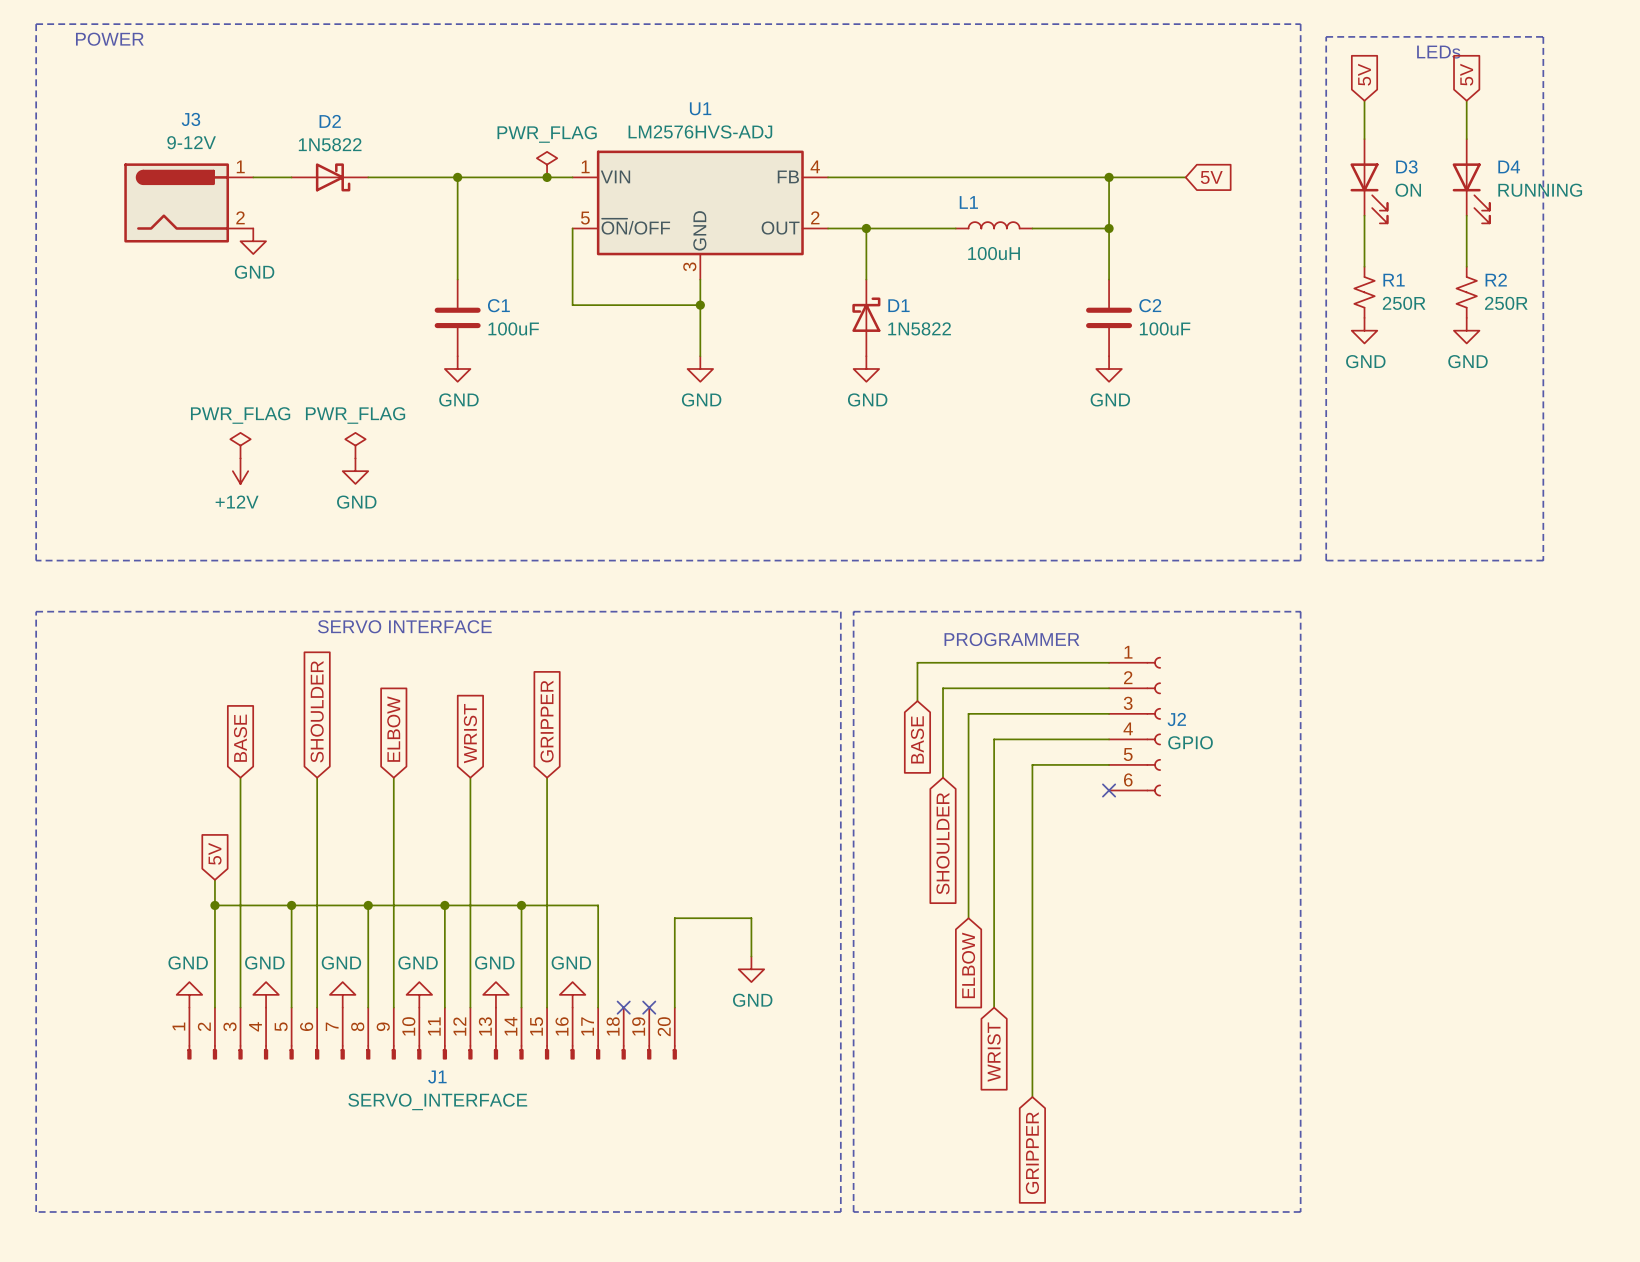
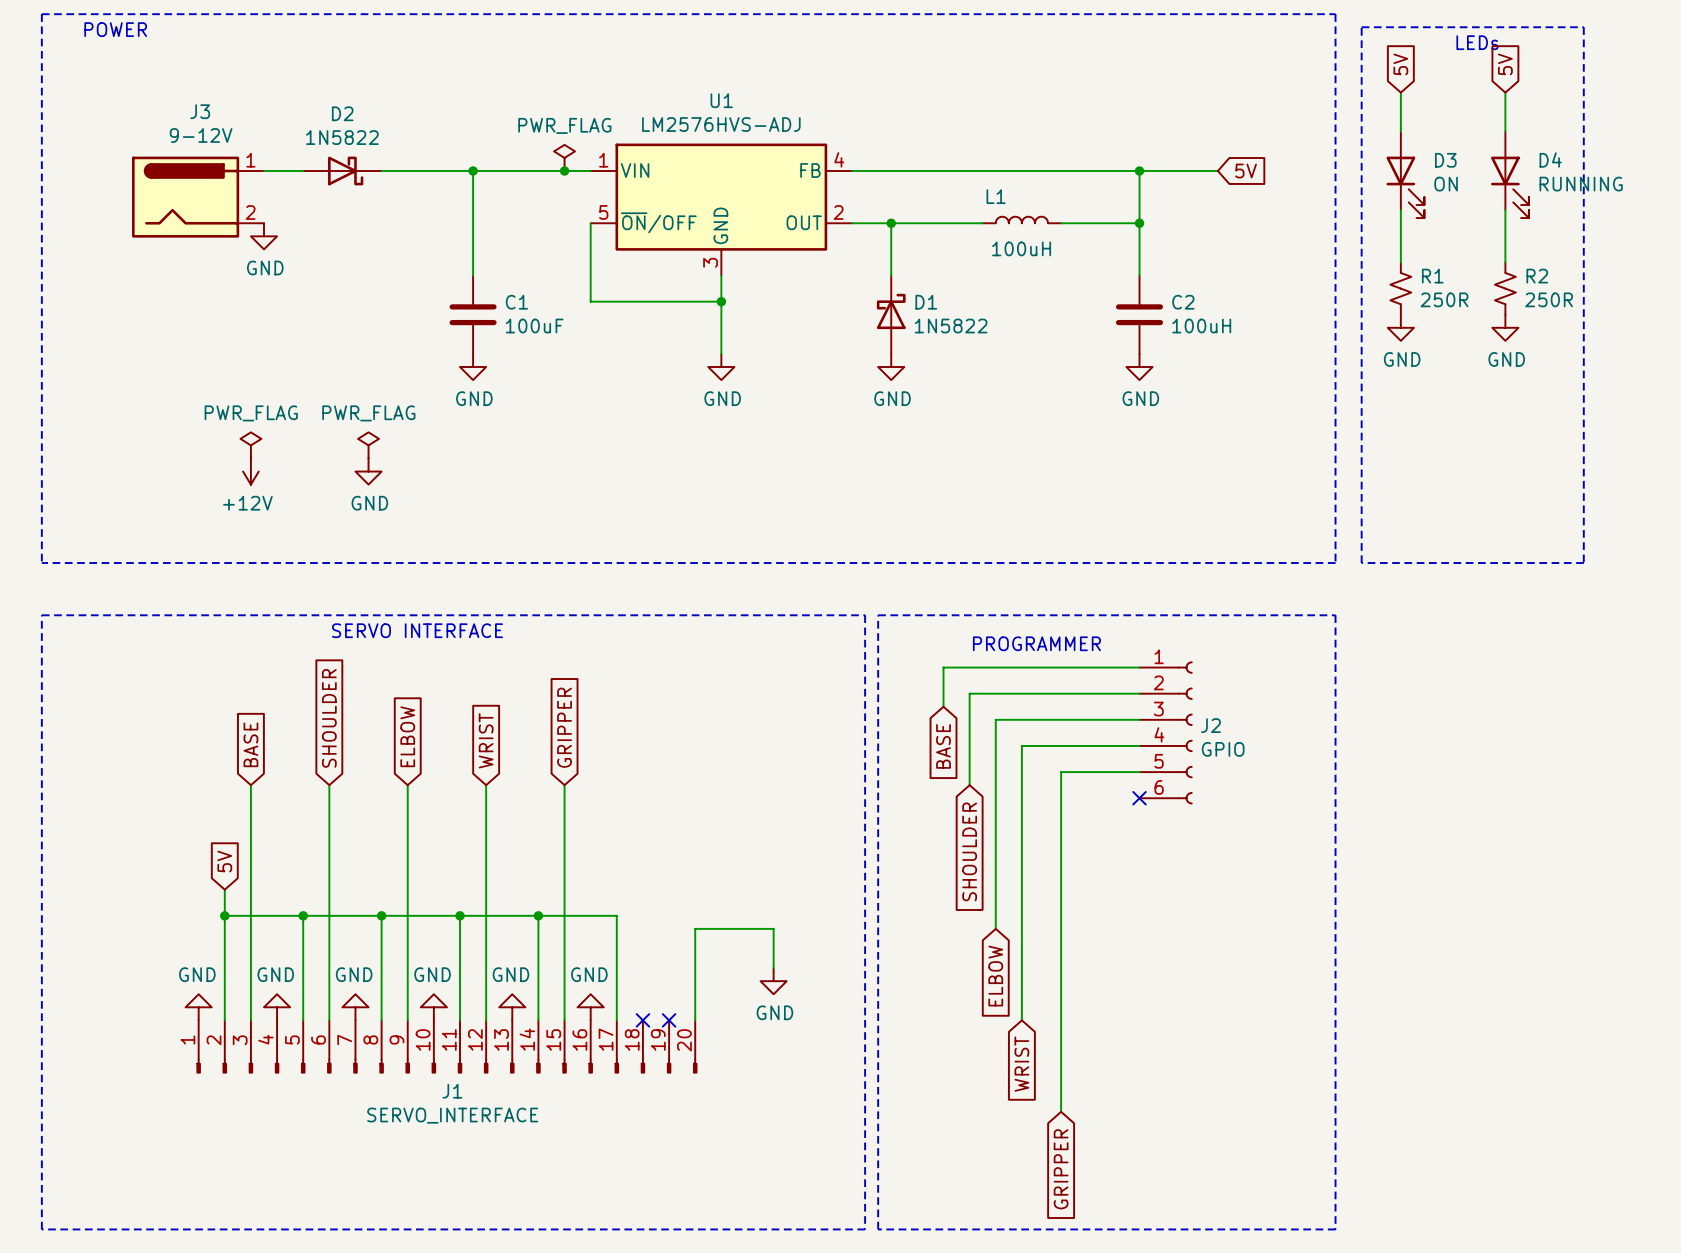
C2 value: 100uF (1165, 328) -> 100uH (1201, 326)

